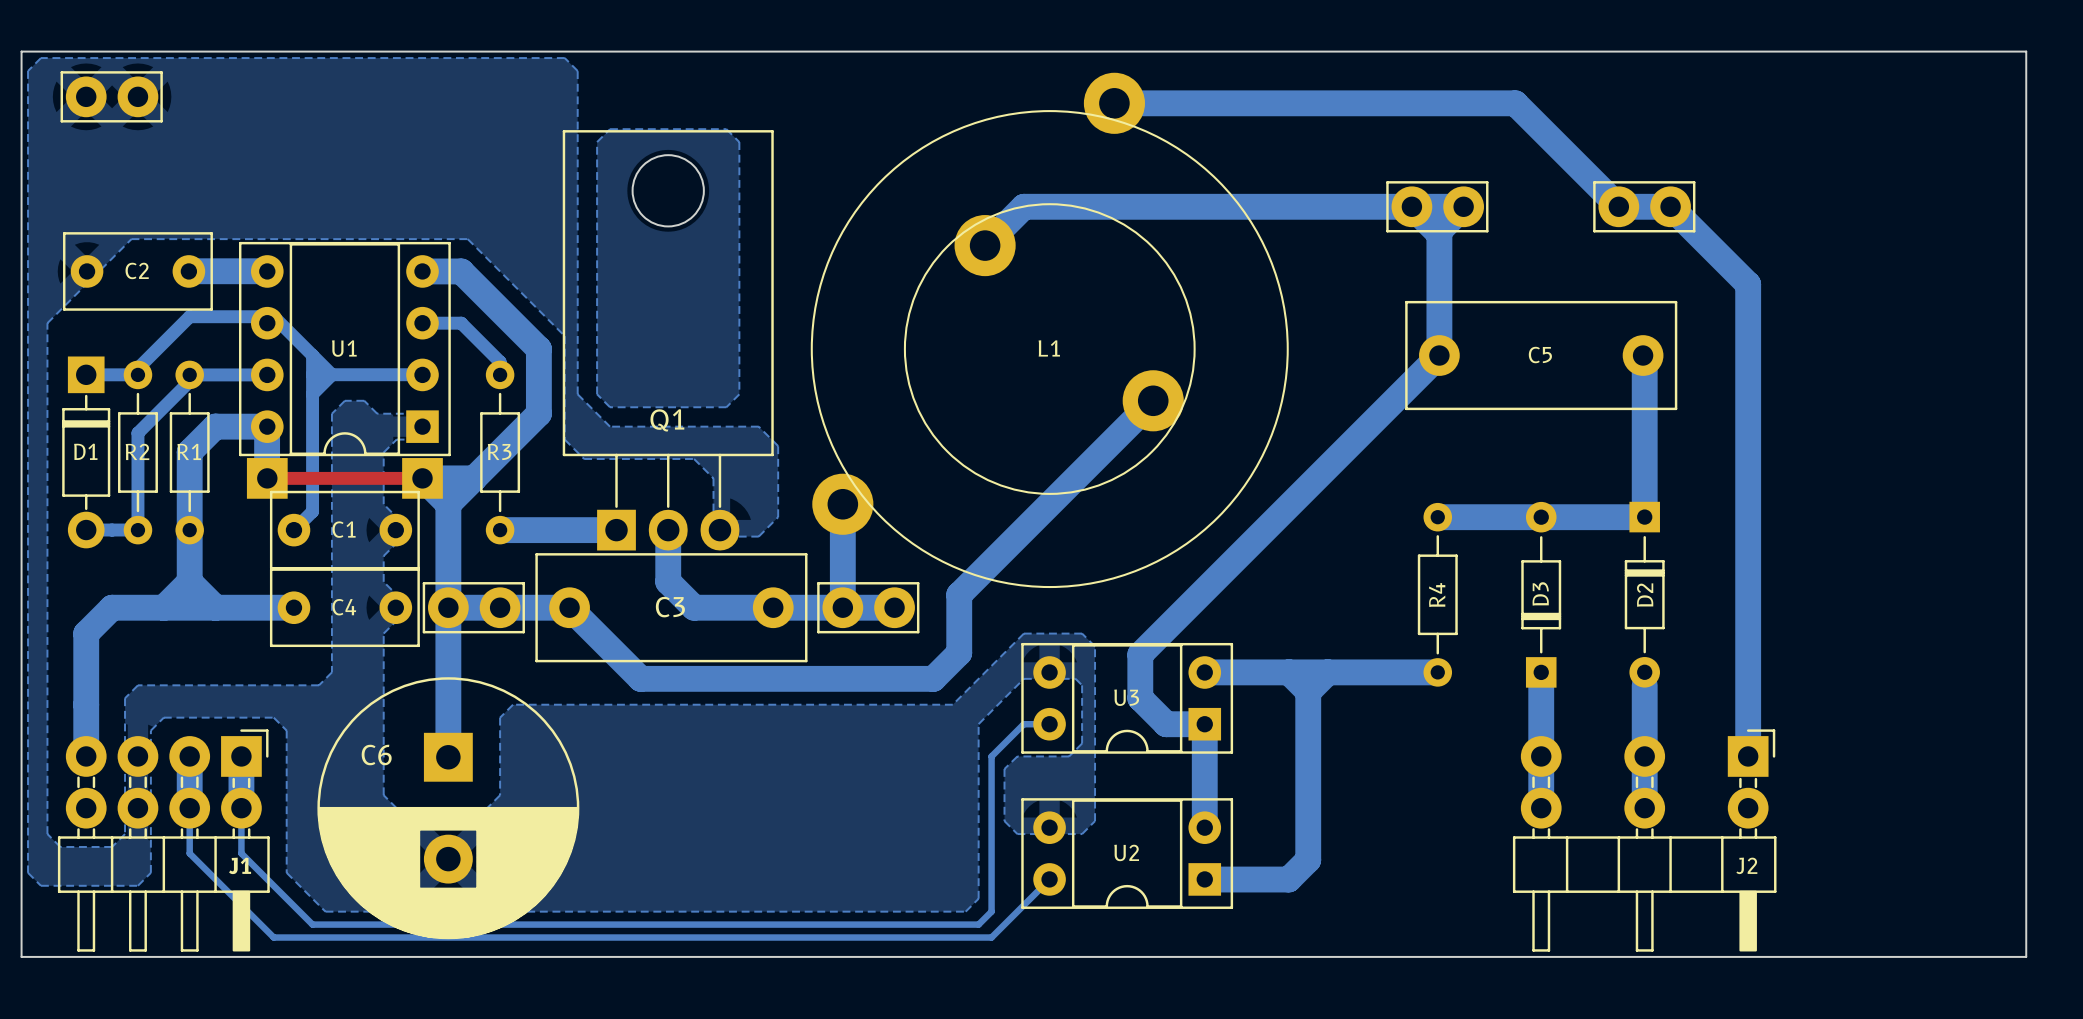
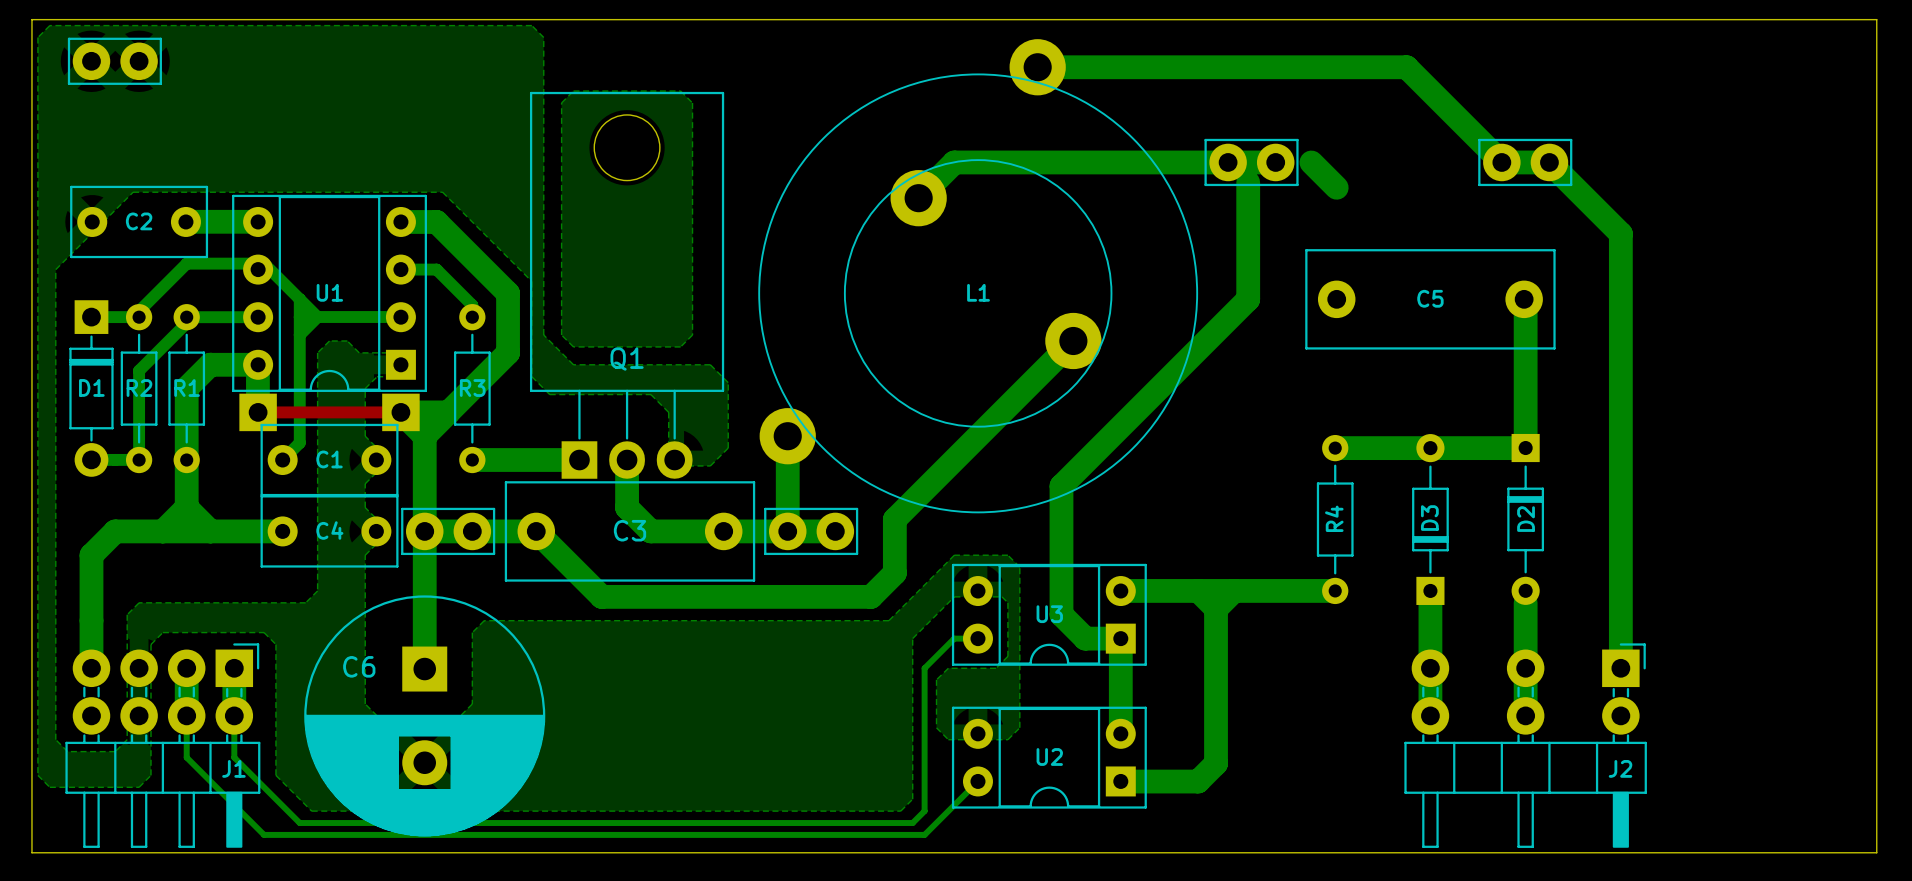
bottom track: (1373, 206) (1463, 206) (1439, 231) (1439, 355) (1140, 654) -> (1248, 182) (1248, 299) (1061, 486) (1061, 574)
part position: (1437, 206) -> (1251, 162)

